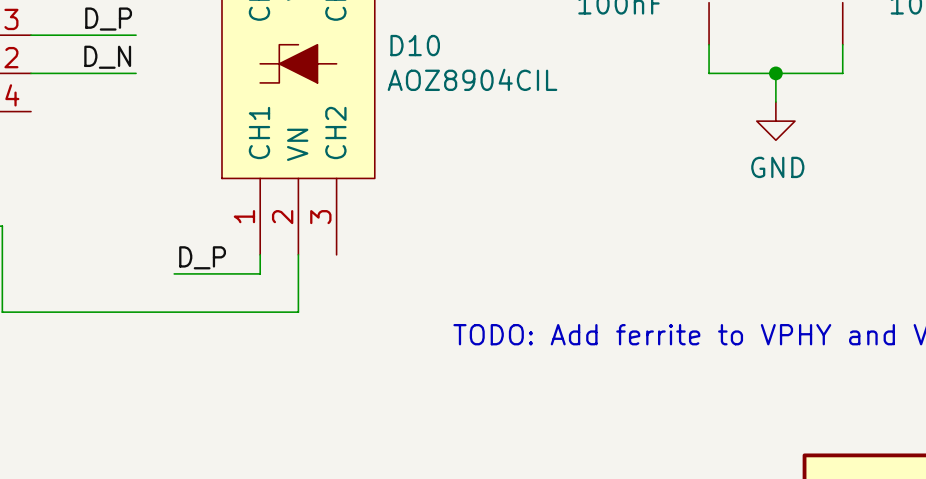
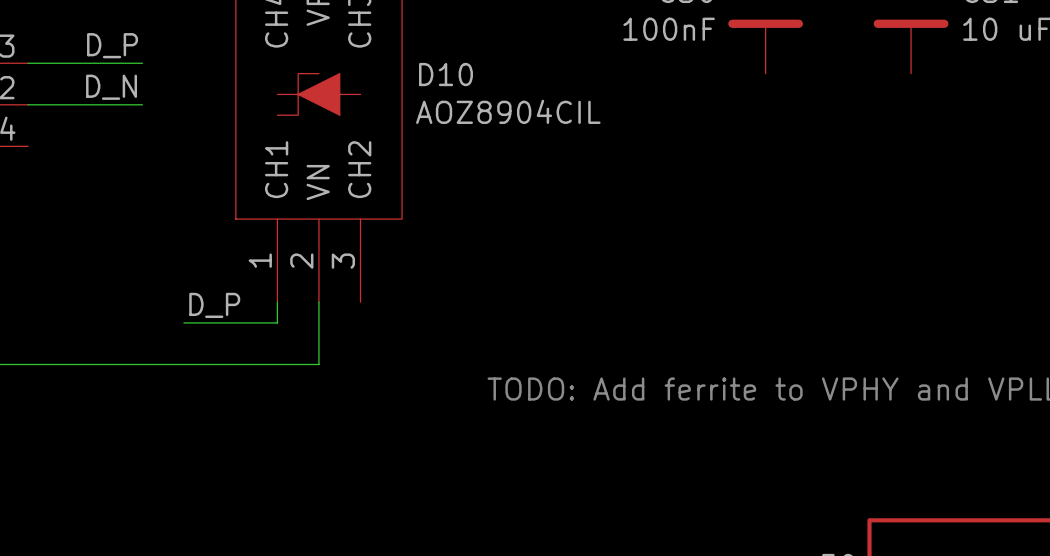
wire: (709, 44) (709, 73) (842, 73) (842, 44) -> none
wire: (775, 73) (775, 102) -> none
junction: (775, 73) -> none
power symbol: GND (775, 121) -> none

